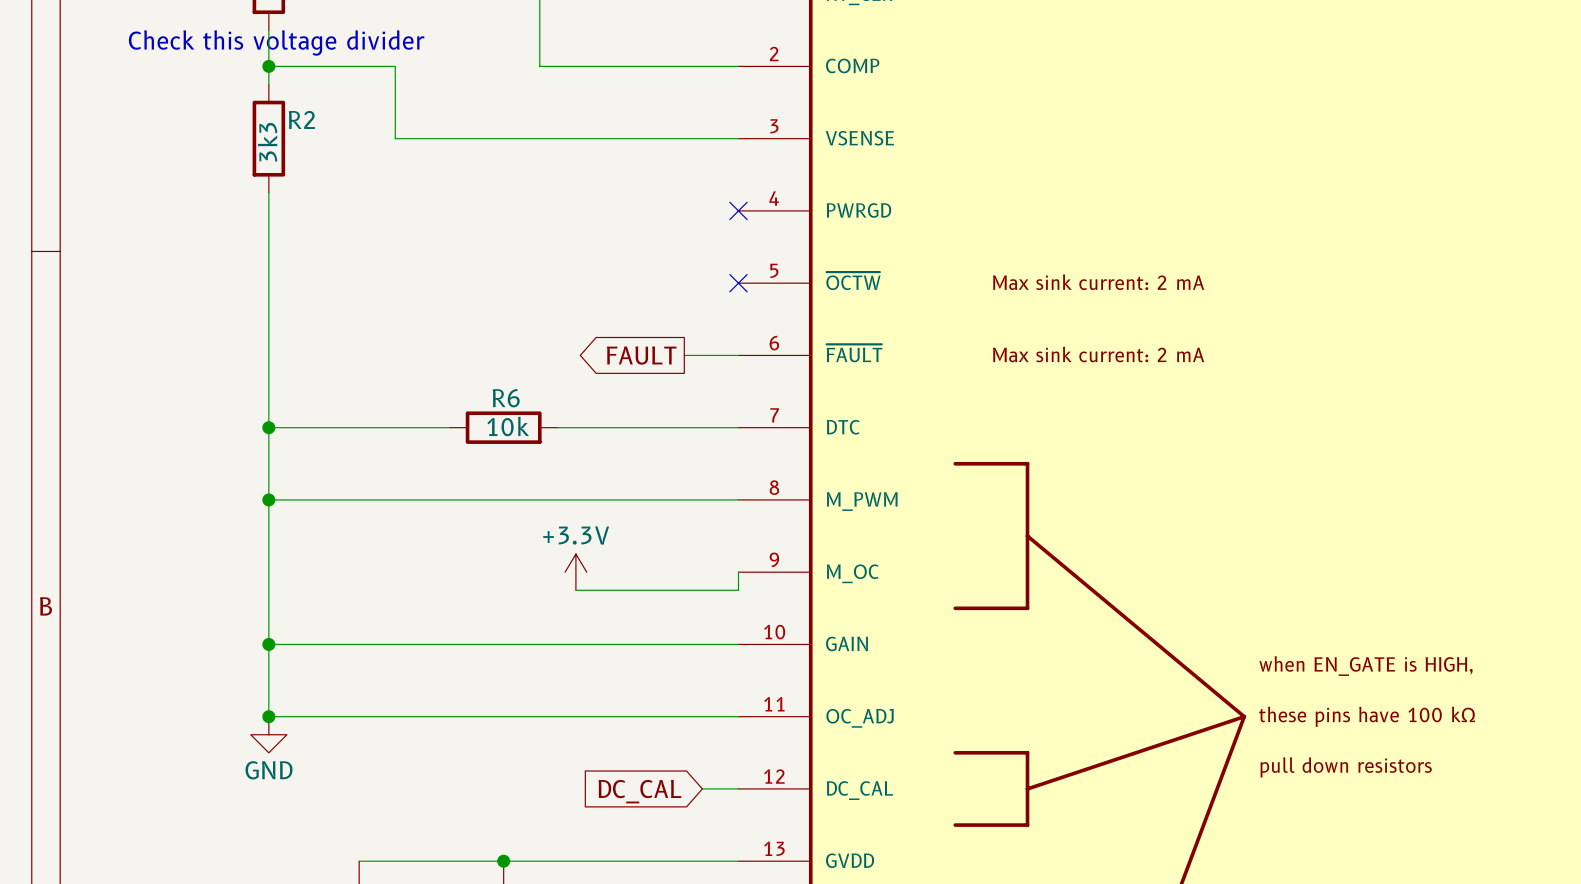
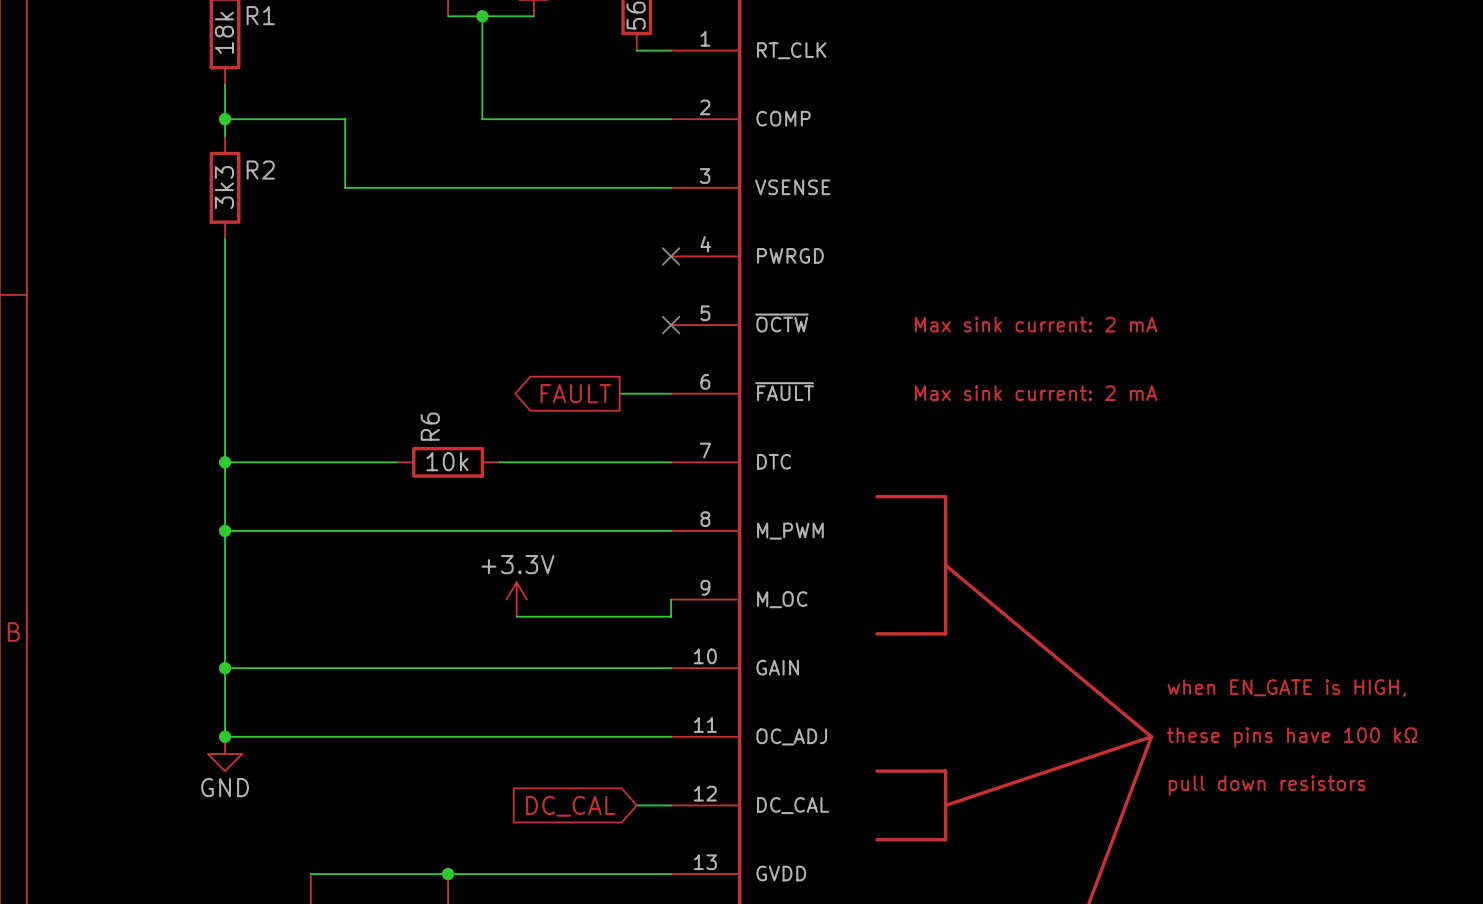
text: Check this voltage divider (276, 42) -> none
R6 name rotation: 0° (506, 398) -> 90° counterclockwise (430, 426)

